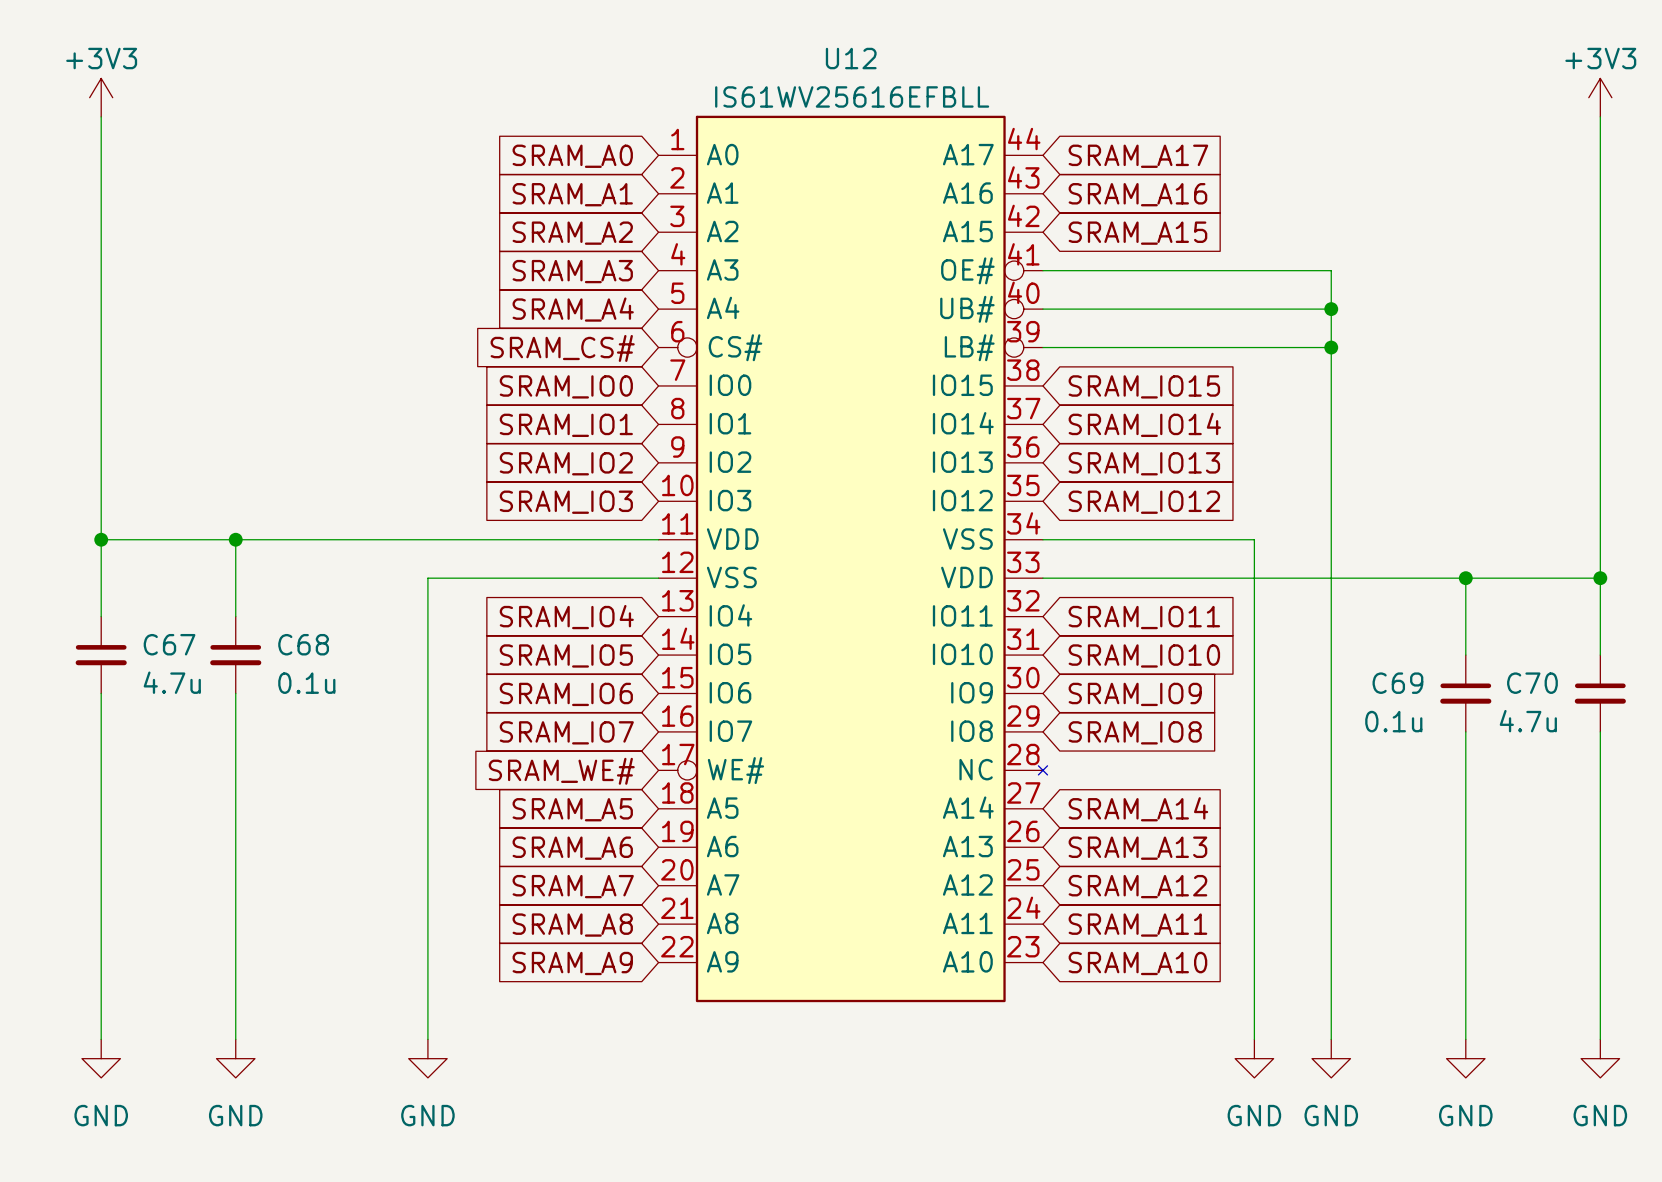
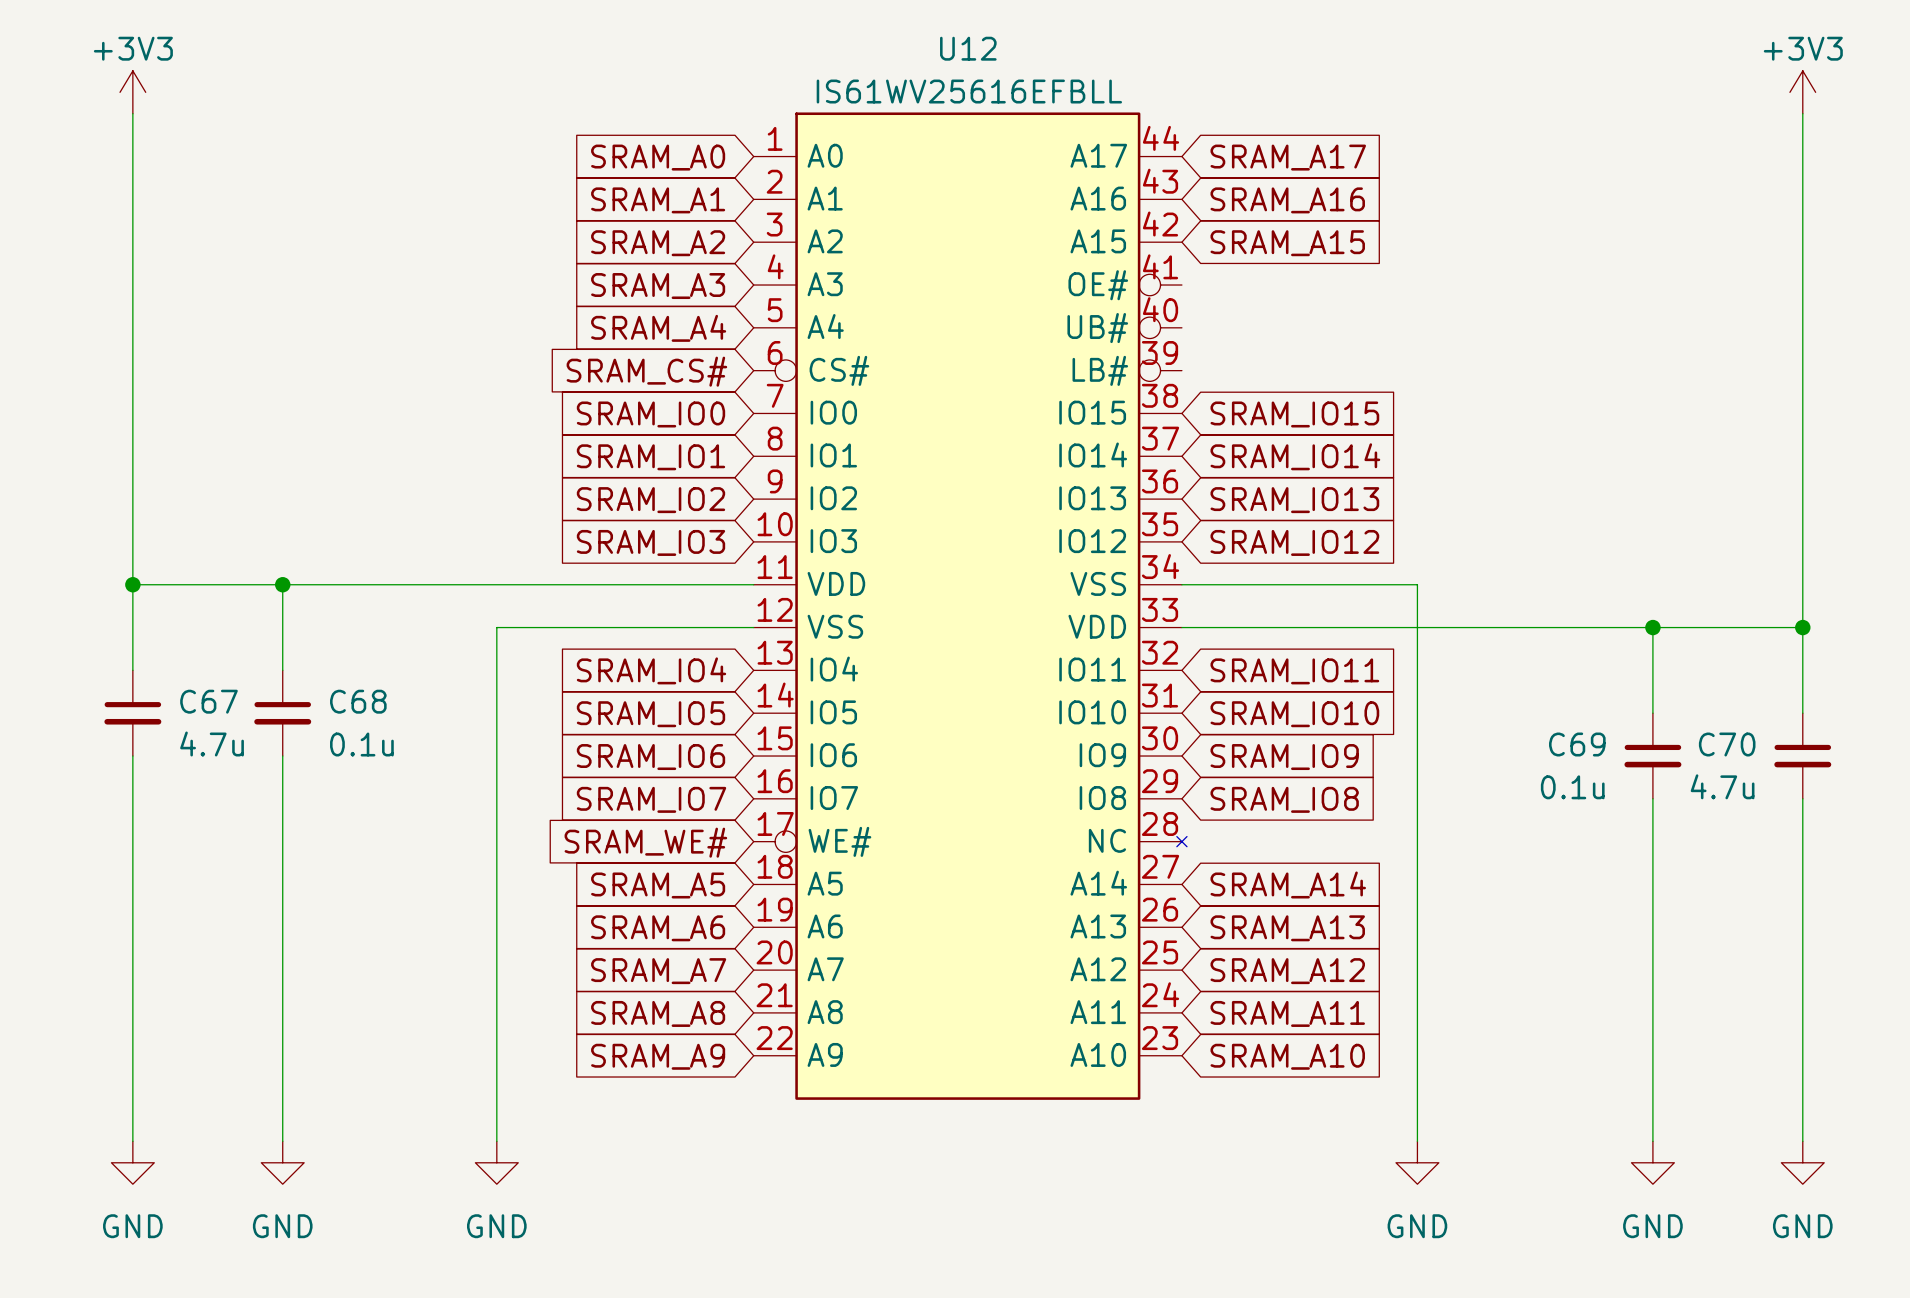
wire: (1042, 270) (1331, 270) (1331, 1039) -> none
wire: (1042, 309) (1331, 309) -> none
junction: (1331, 309) -> none
wire: (1042, 347) (1331, 347) -> none
junction: (1331, 347) -> none
power symbol: GND (1331, 1058) -> none

